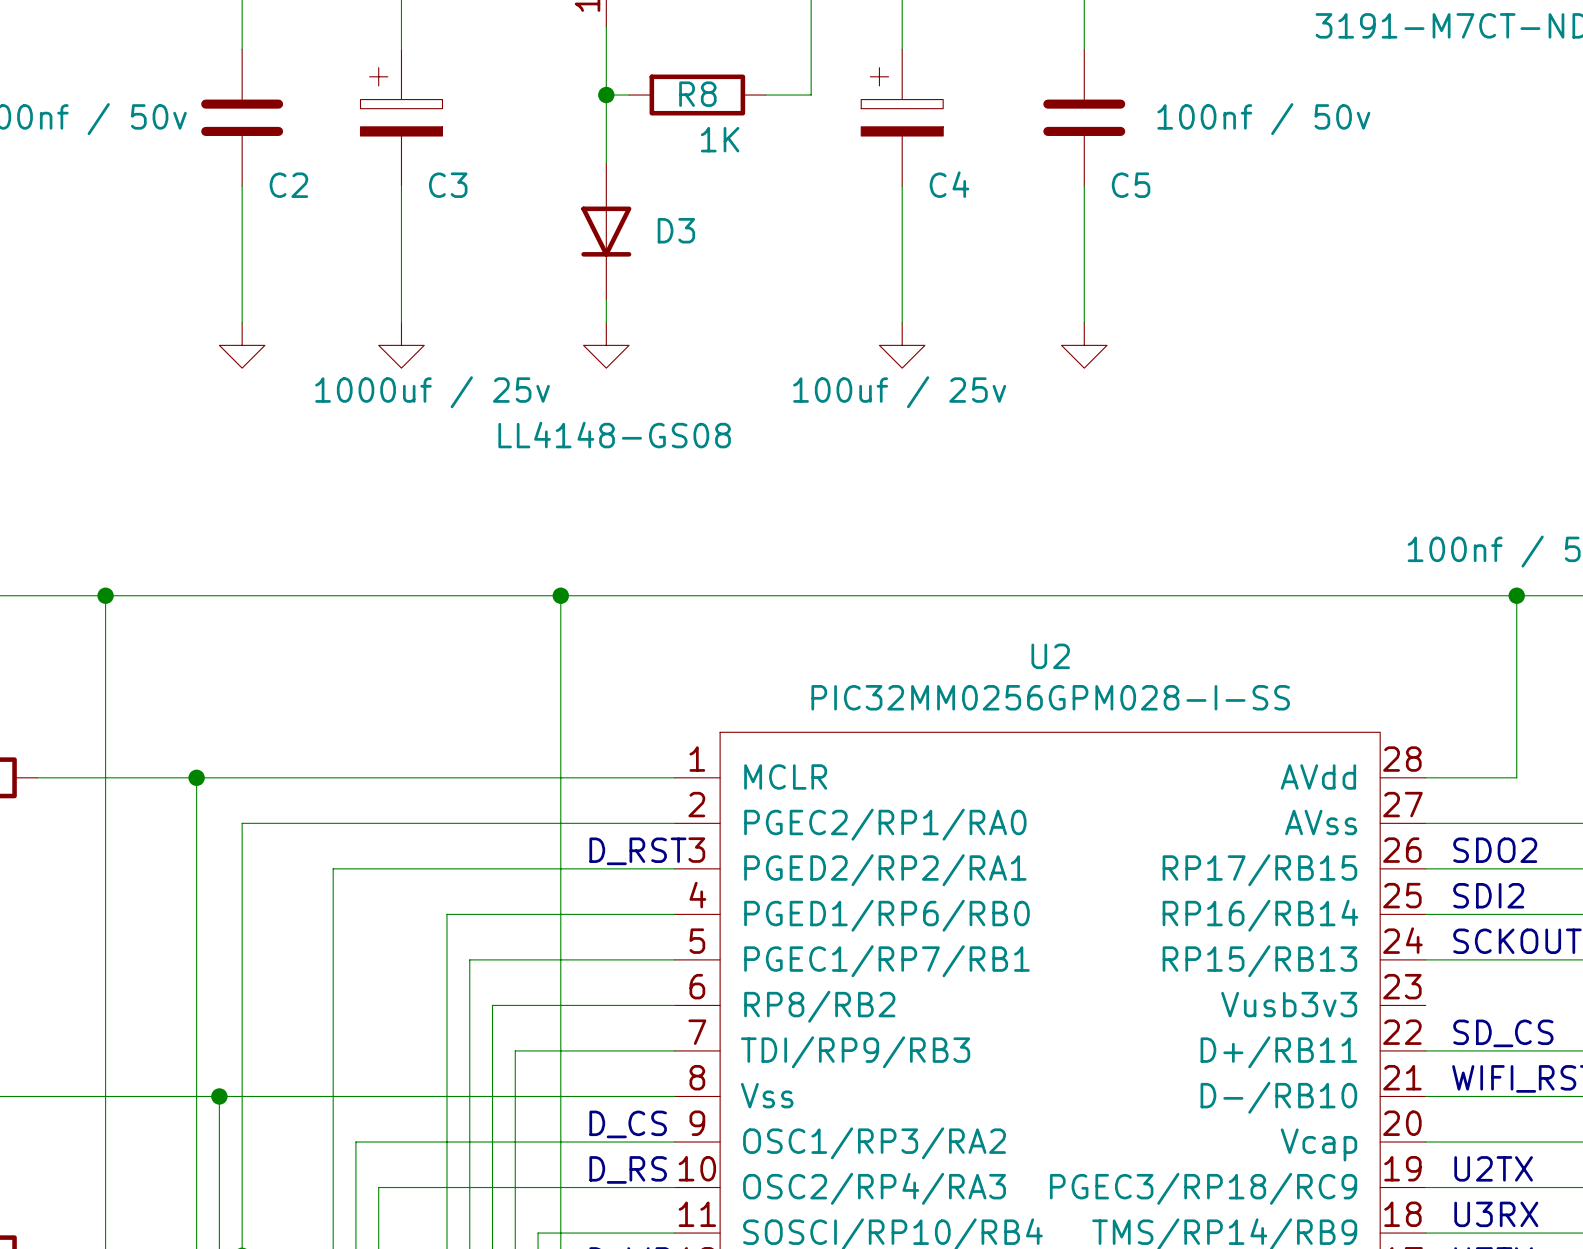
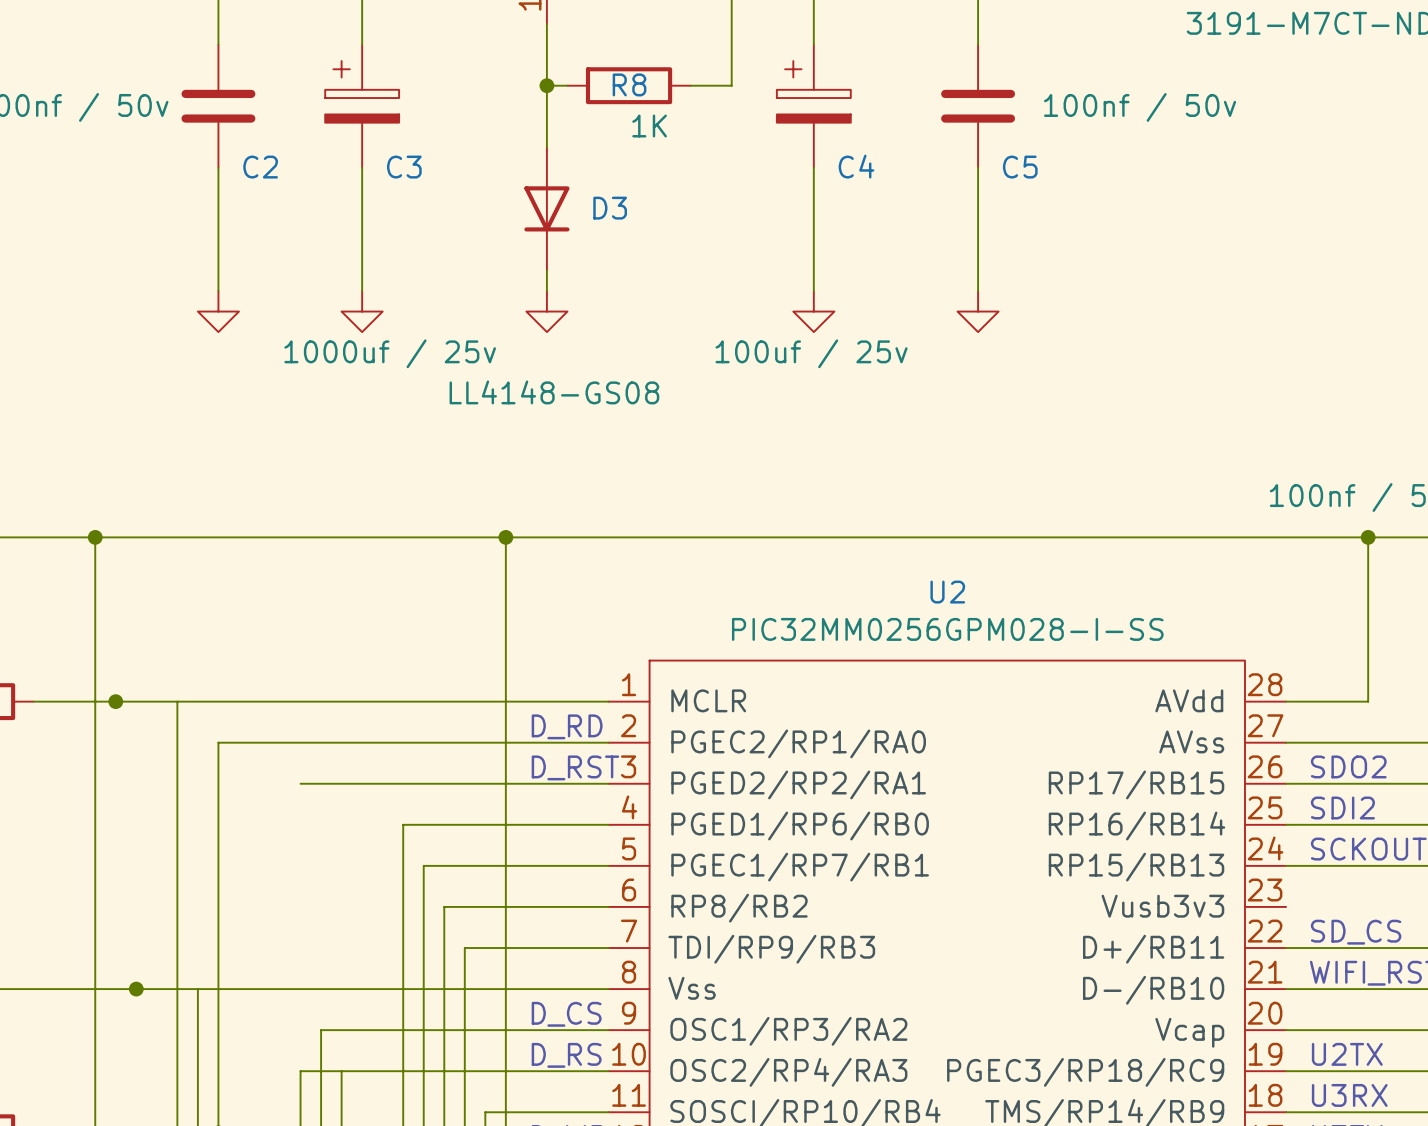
junction position: (196, 777) -> (115, 701)
text: none -> D_RD (567, 726)
wire: (333, 868) (333, 1187) -> (341, 1071) (300, 1071)
junction position: (219, 1096) -> (136, 989)

